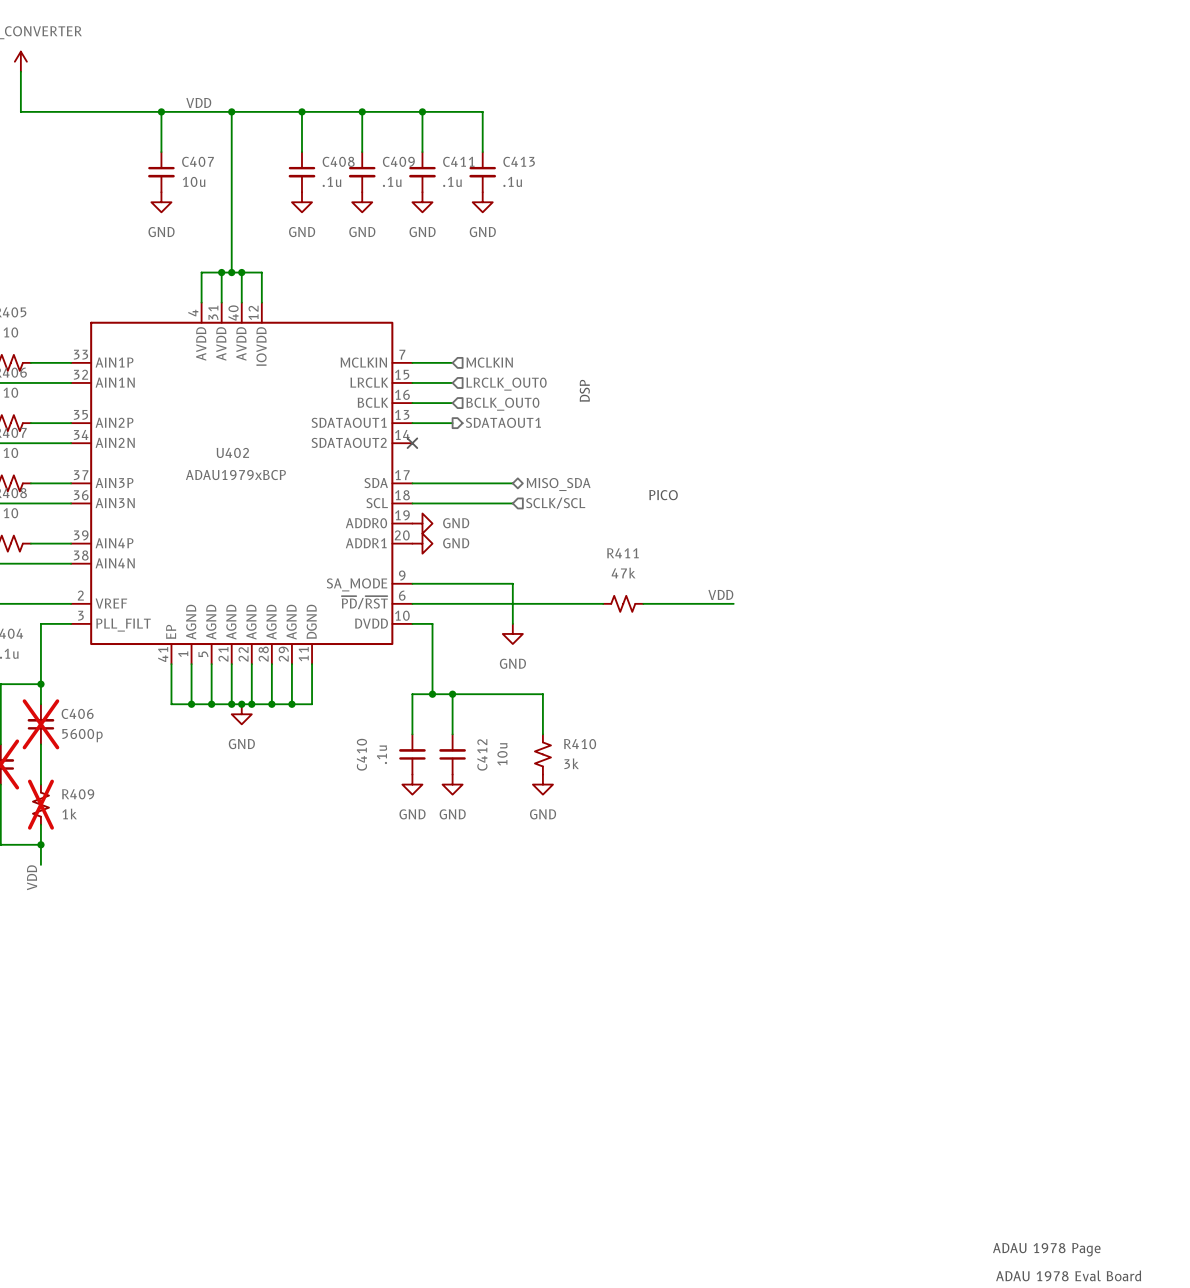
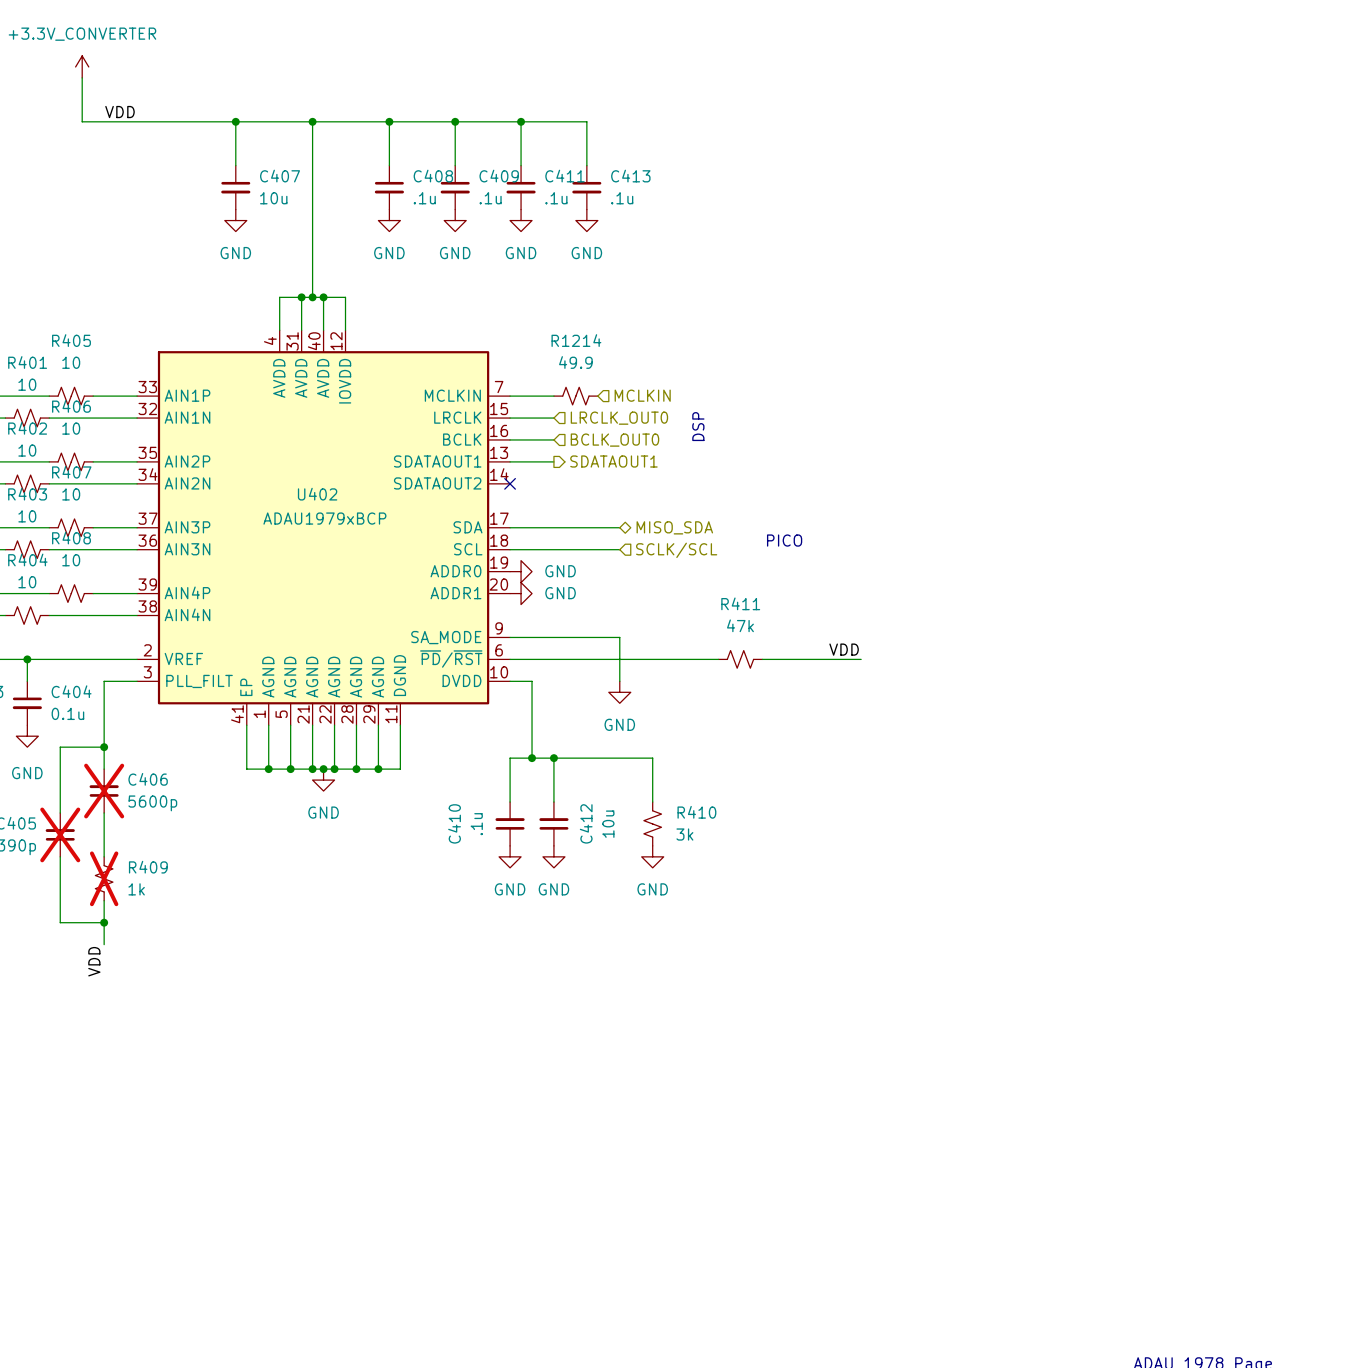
label position: VDD (198, 103) -> VDD (119, 112)
R1214: none -> 49.9 (575, 396)
hierarchical label position: MCLKIN (489, 362) -> MCLKIN (642, 395)

